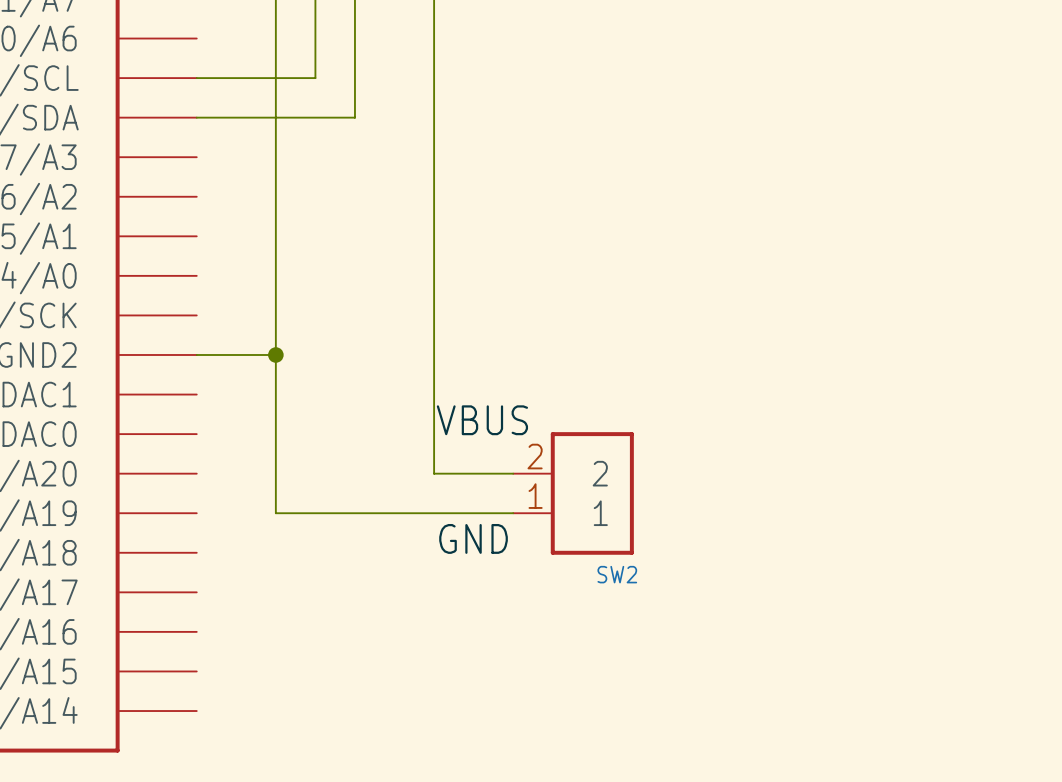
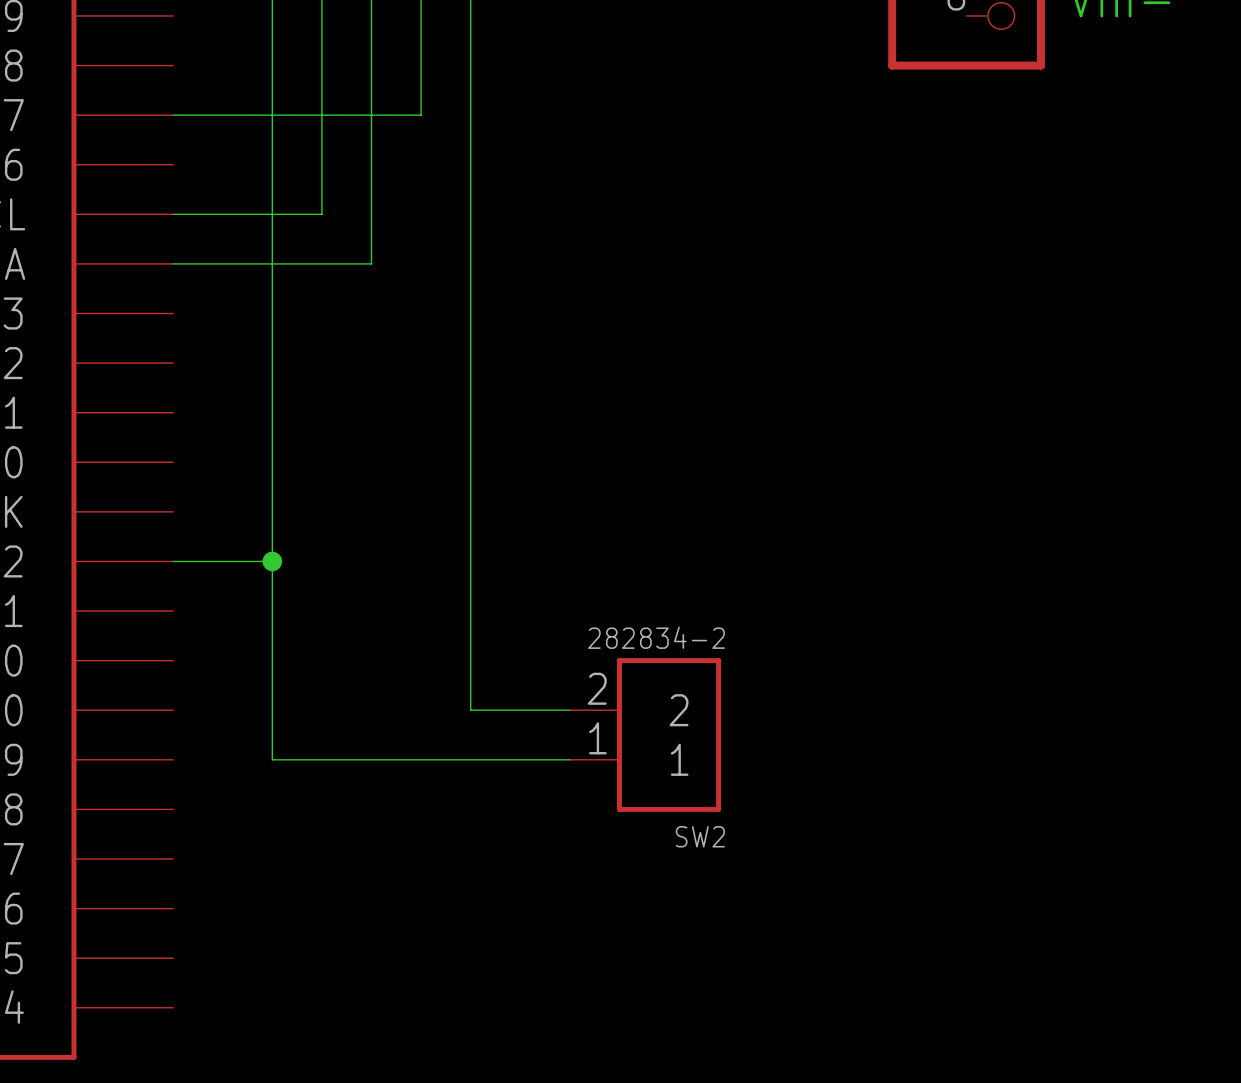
SW2 value: none -> 282834-2 (656, 637)
label: VBUS (482, 420) -> none
label: GND (473, 538) -> none

